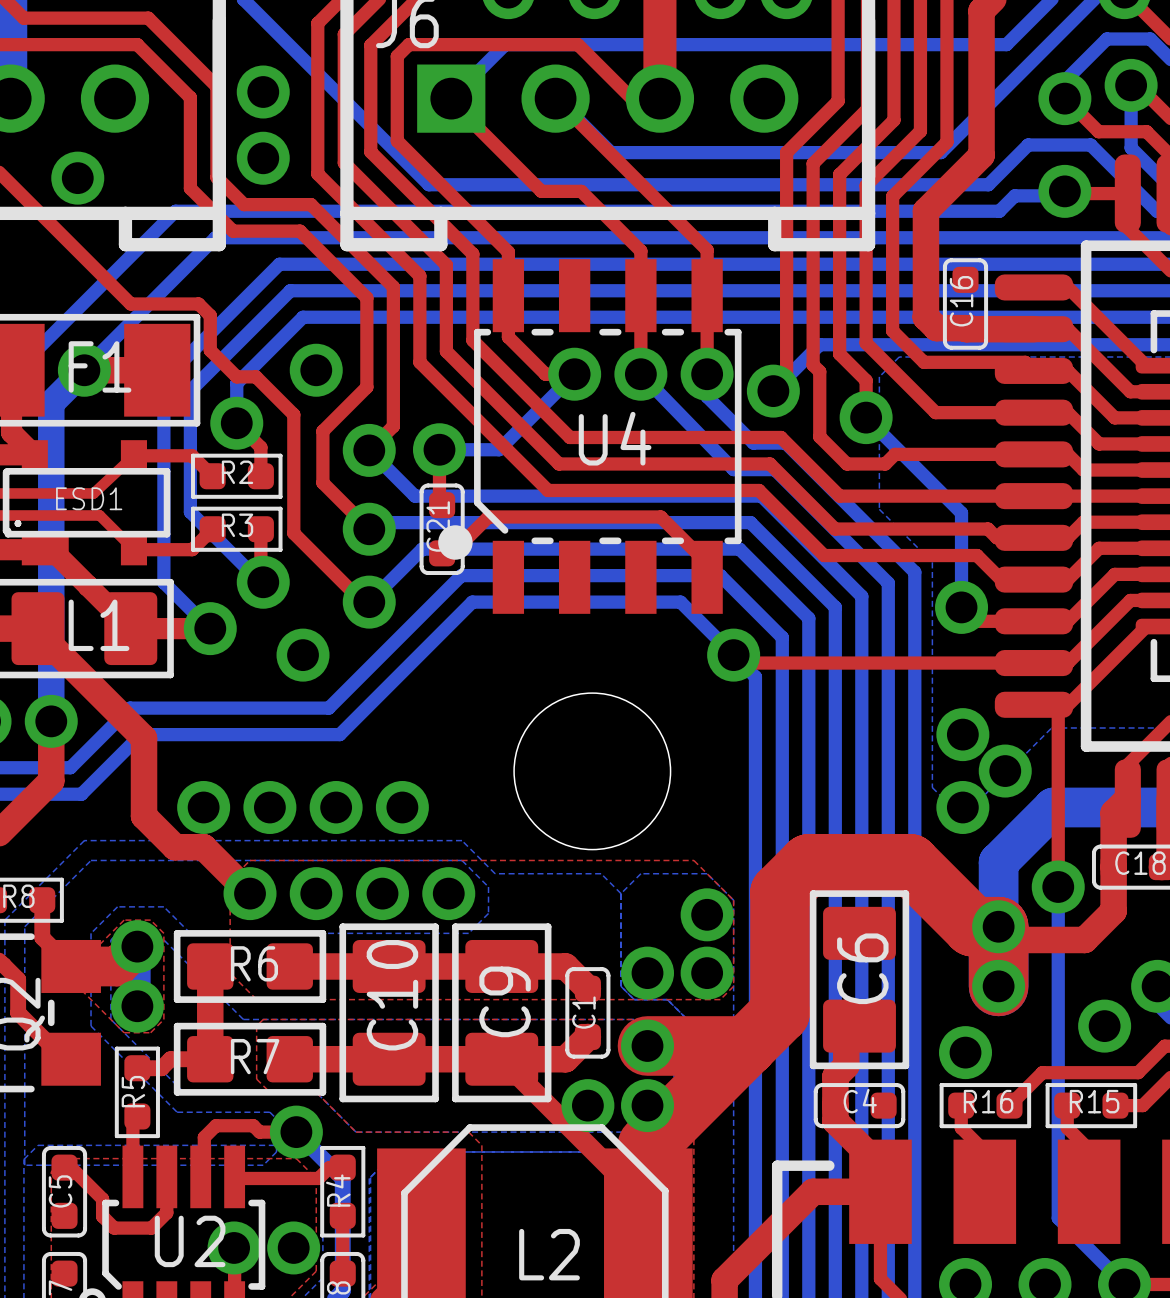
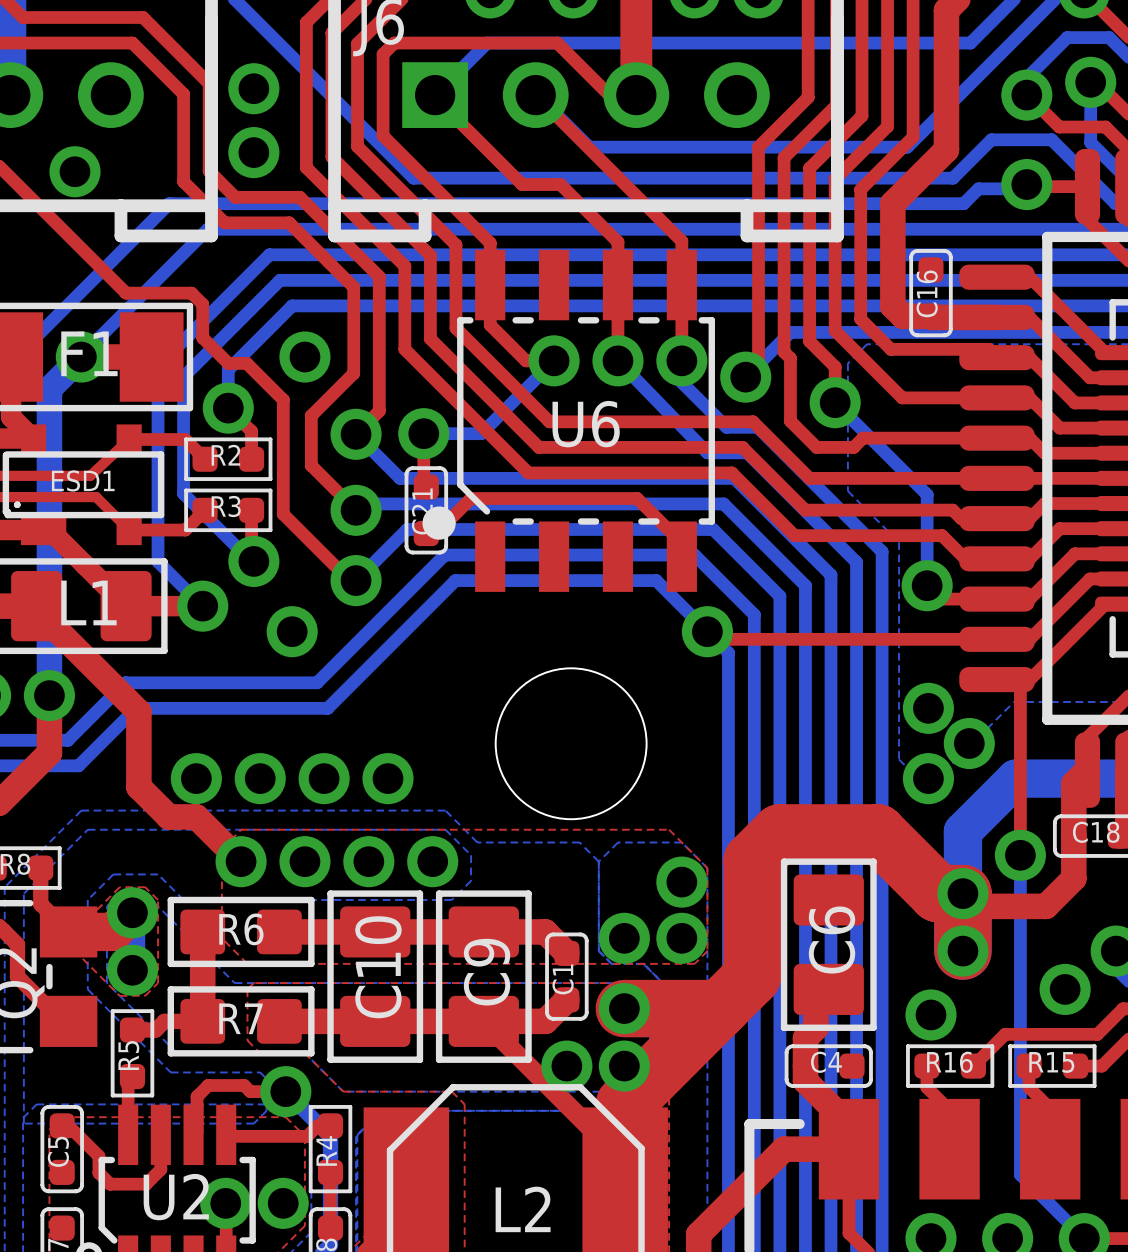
U4 name: U4 (615, 438) -> U6 (586, 424)

